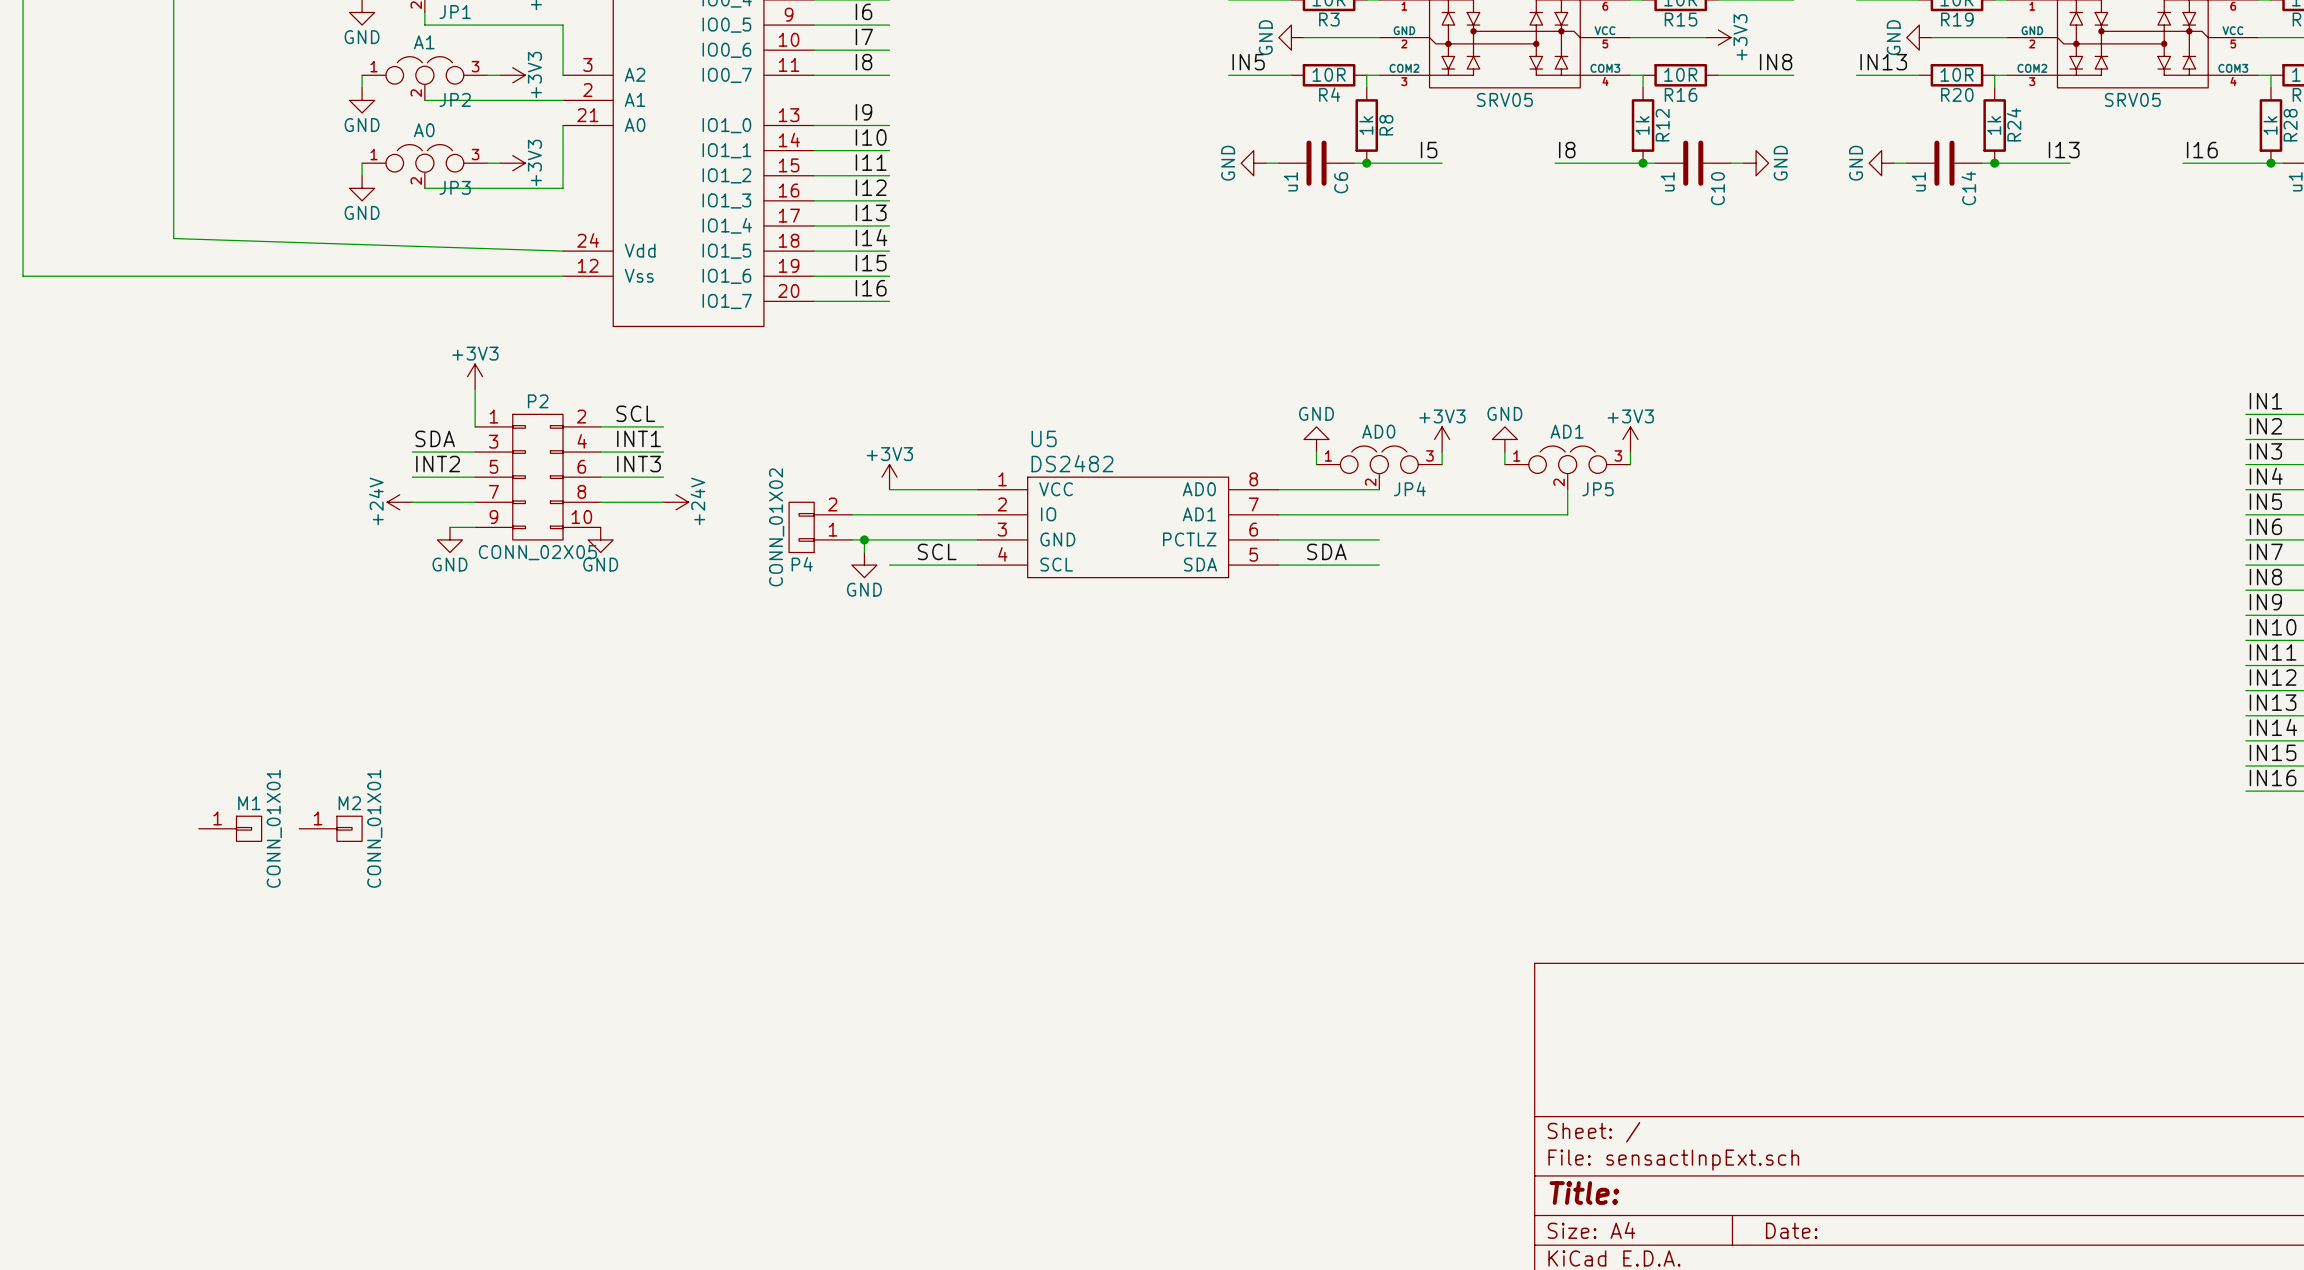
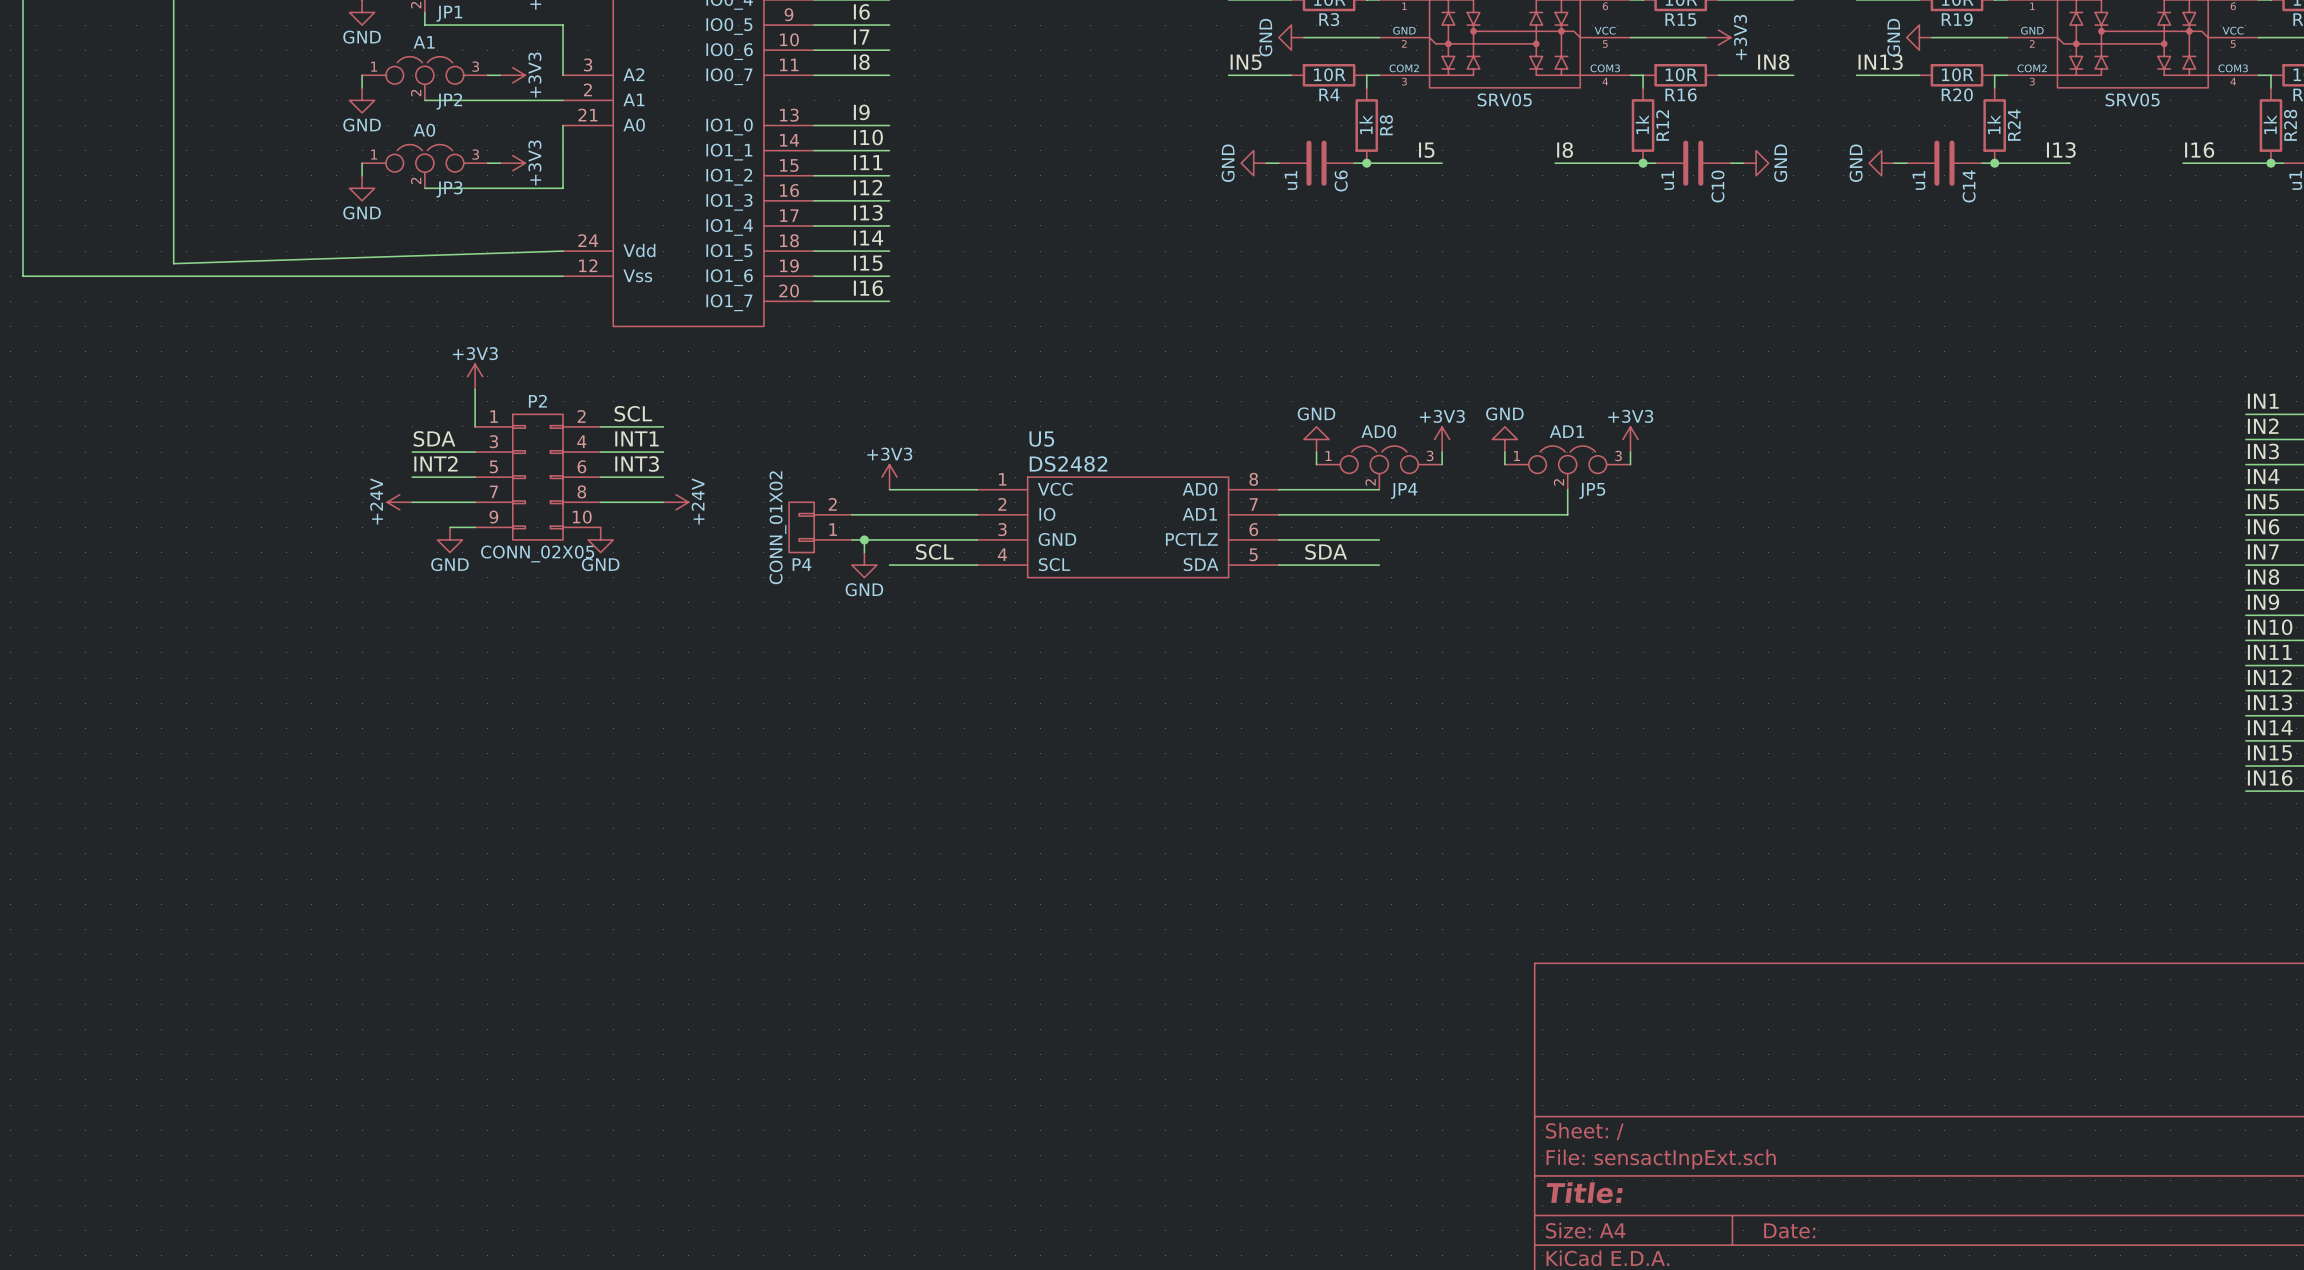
wire: (173, 238) (563, 251) -> (173, 238) (173, 263) (563, 251)
M1: CONN_01X01 (230, 828) -> none
M2: CONN_01X01 (330, 828) -> none

